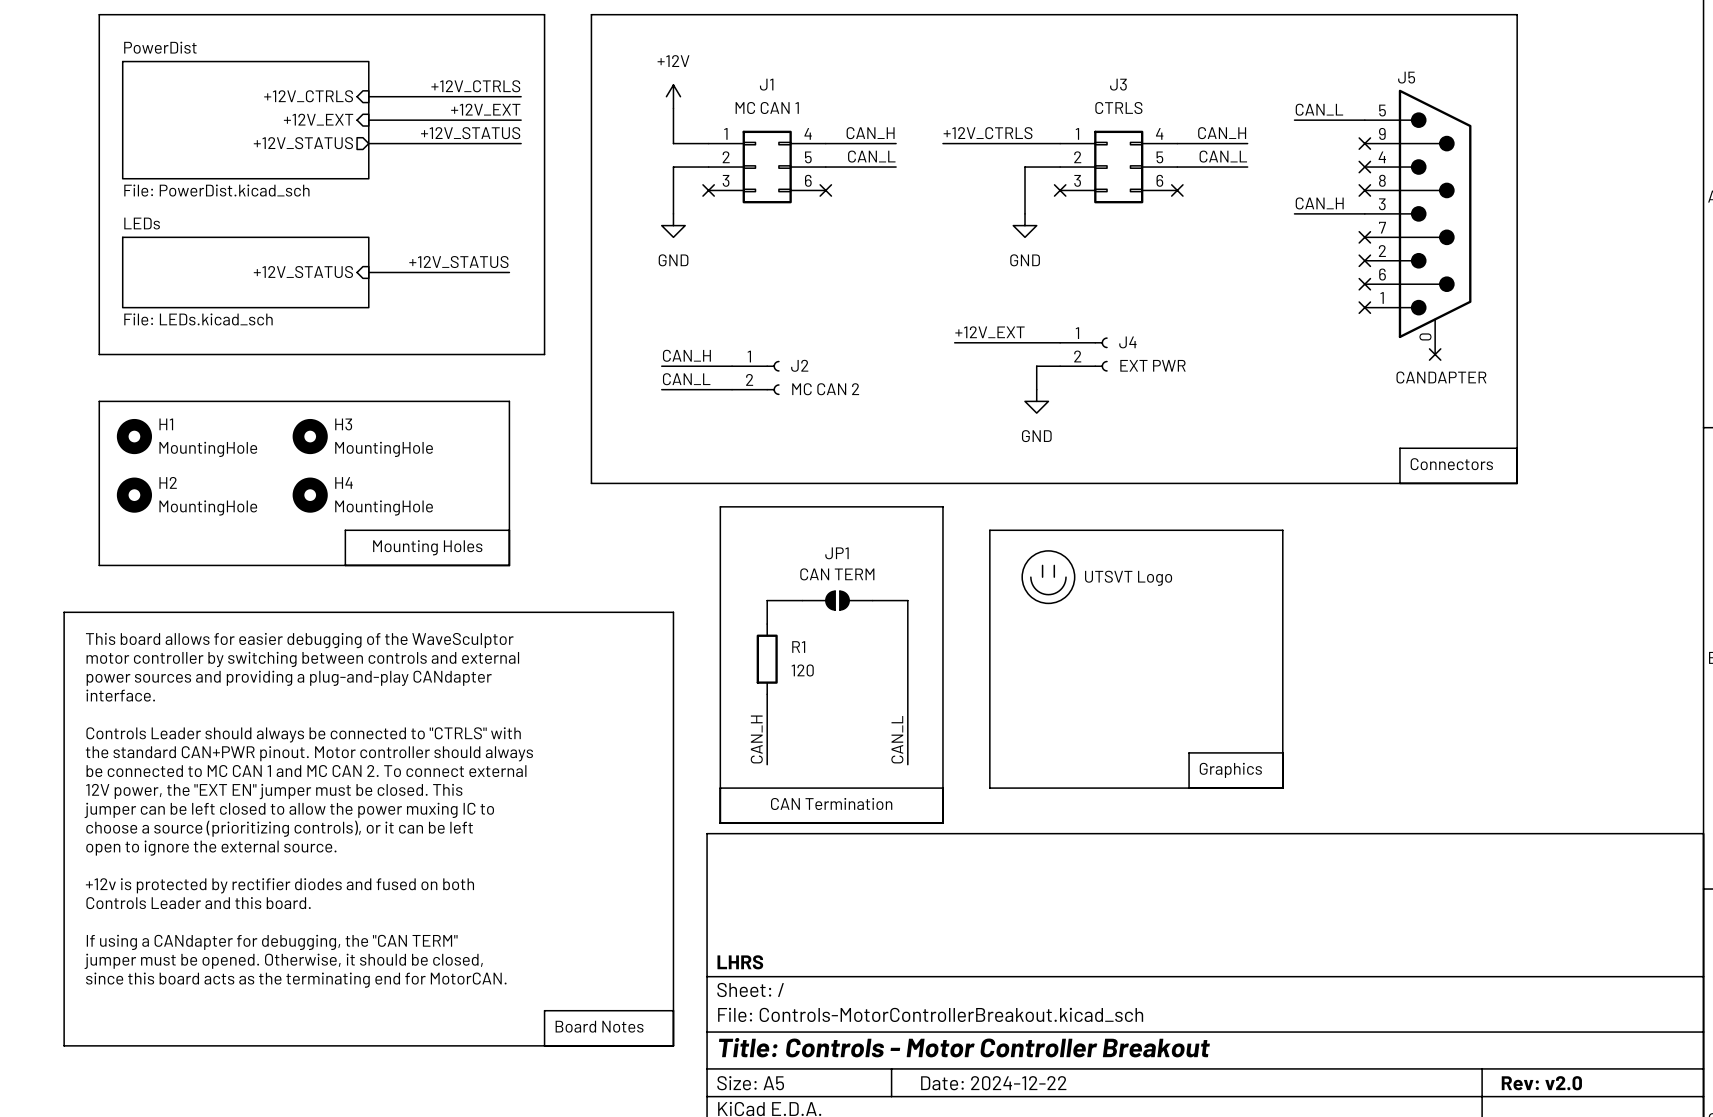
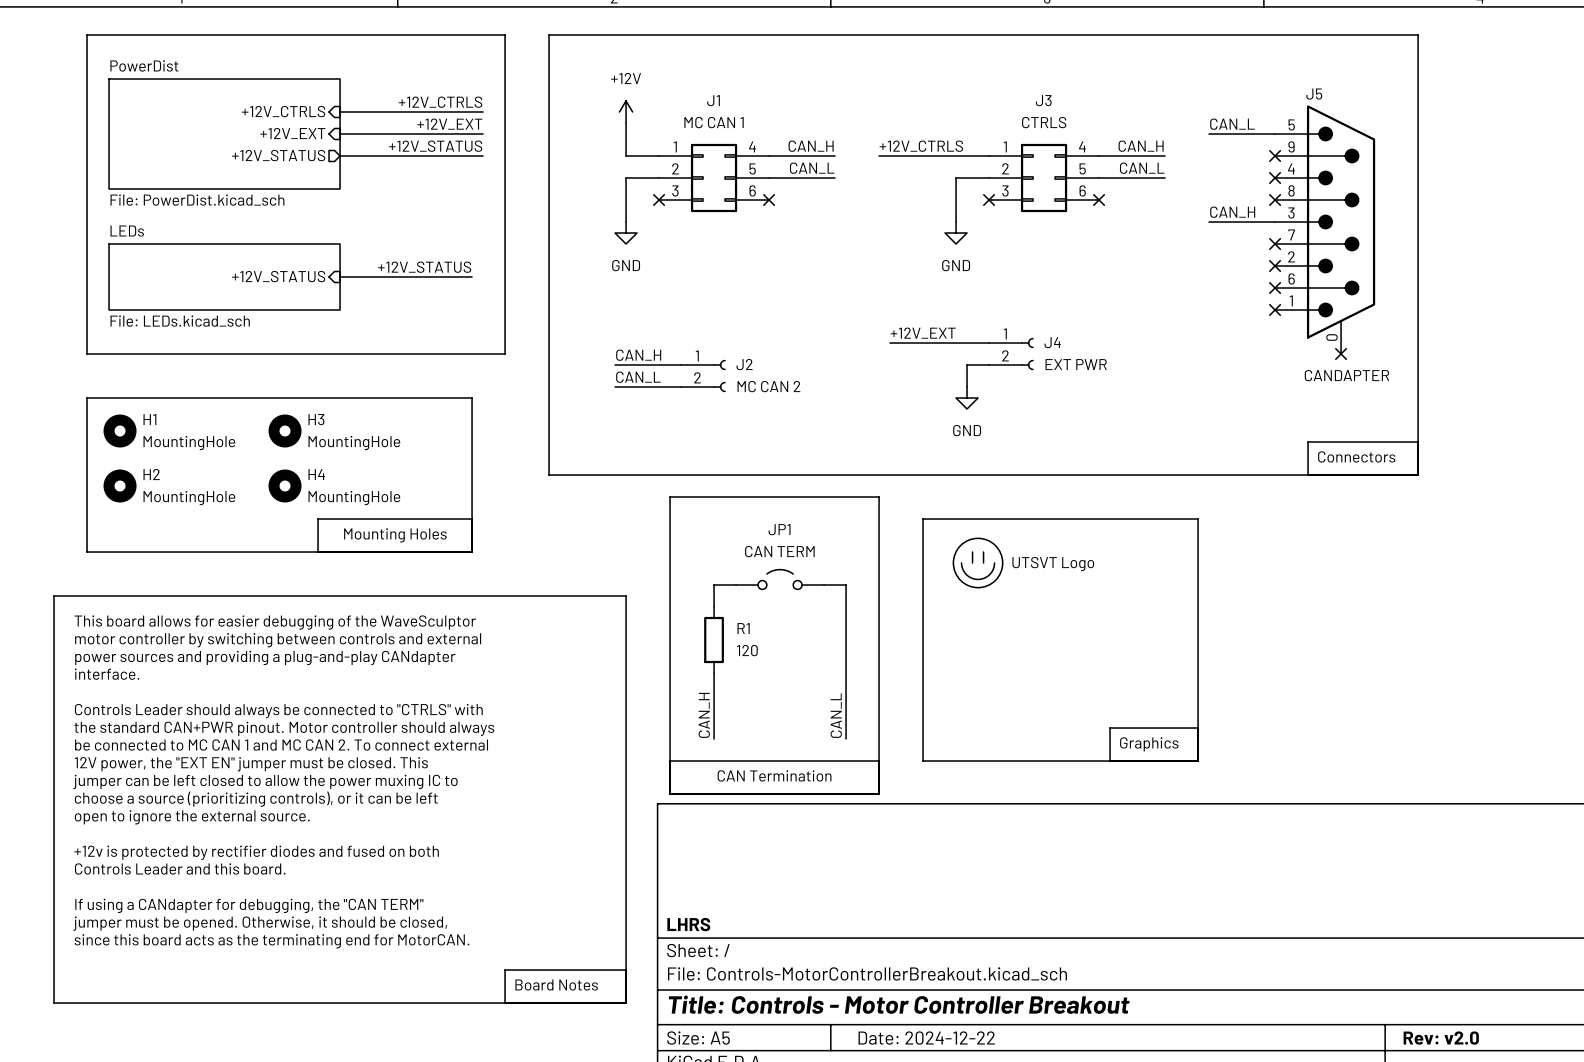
JP1 symbol: [802, 591, 873, 610] -> [736, 569, 825, 590]

